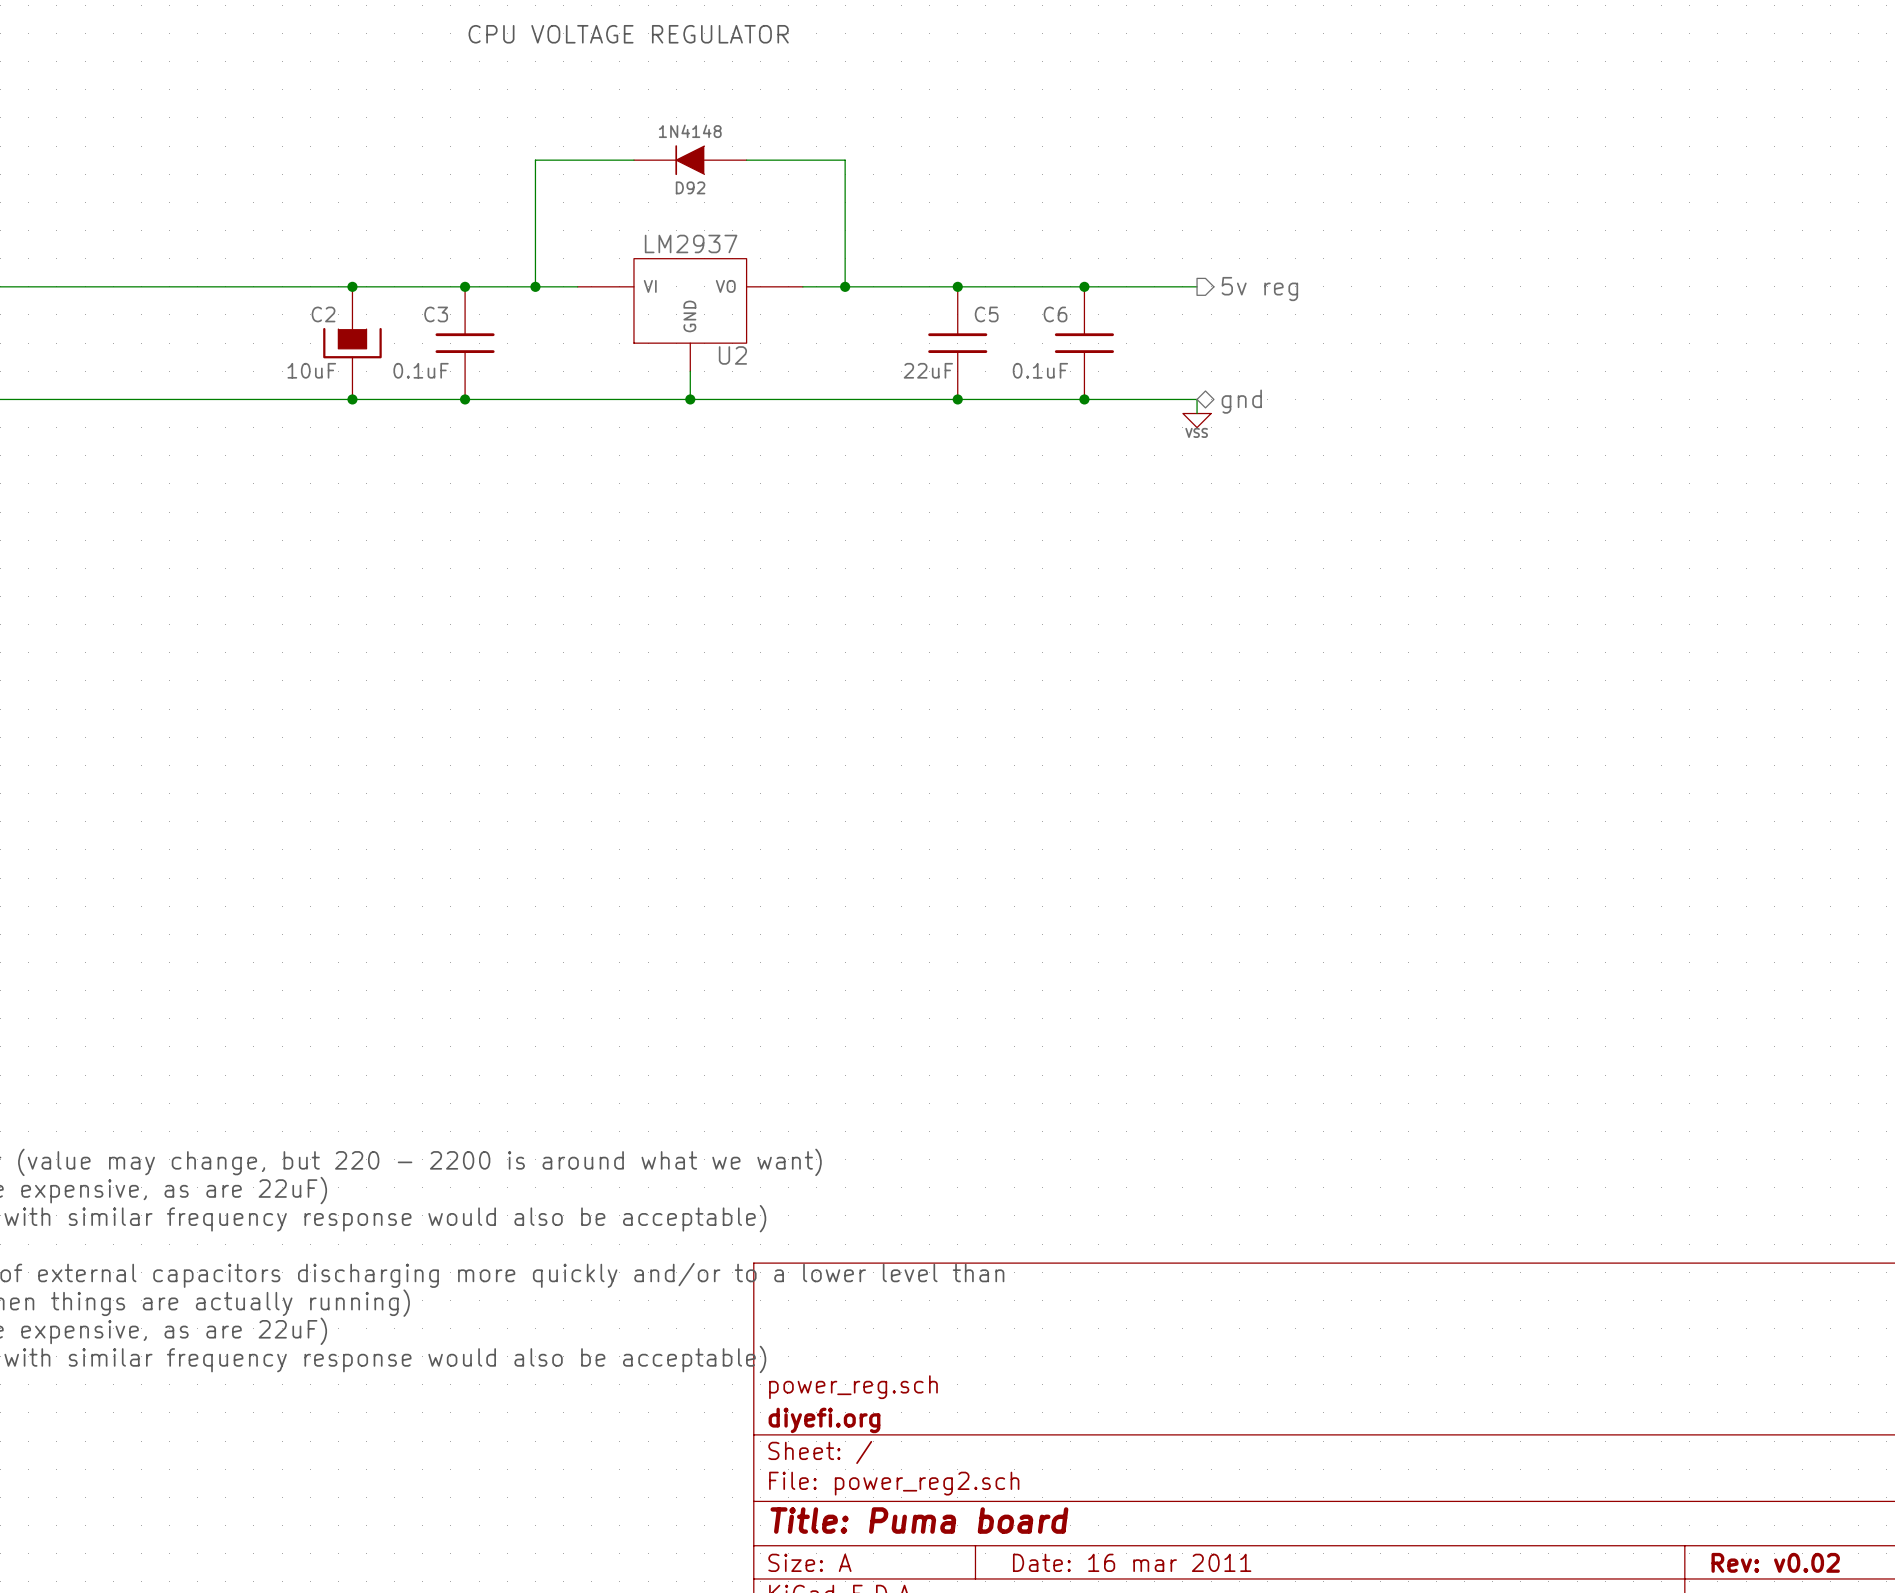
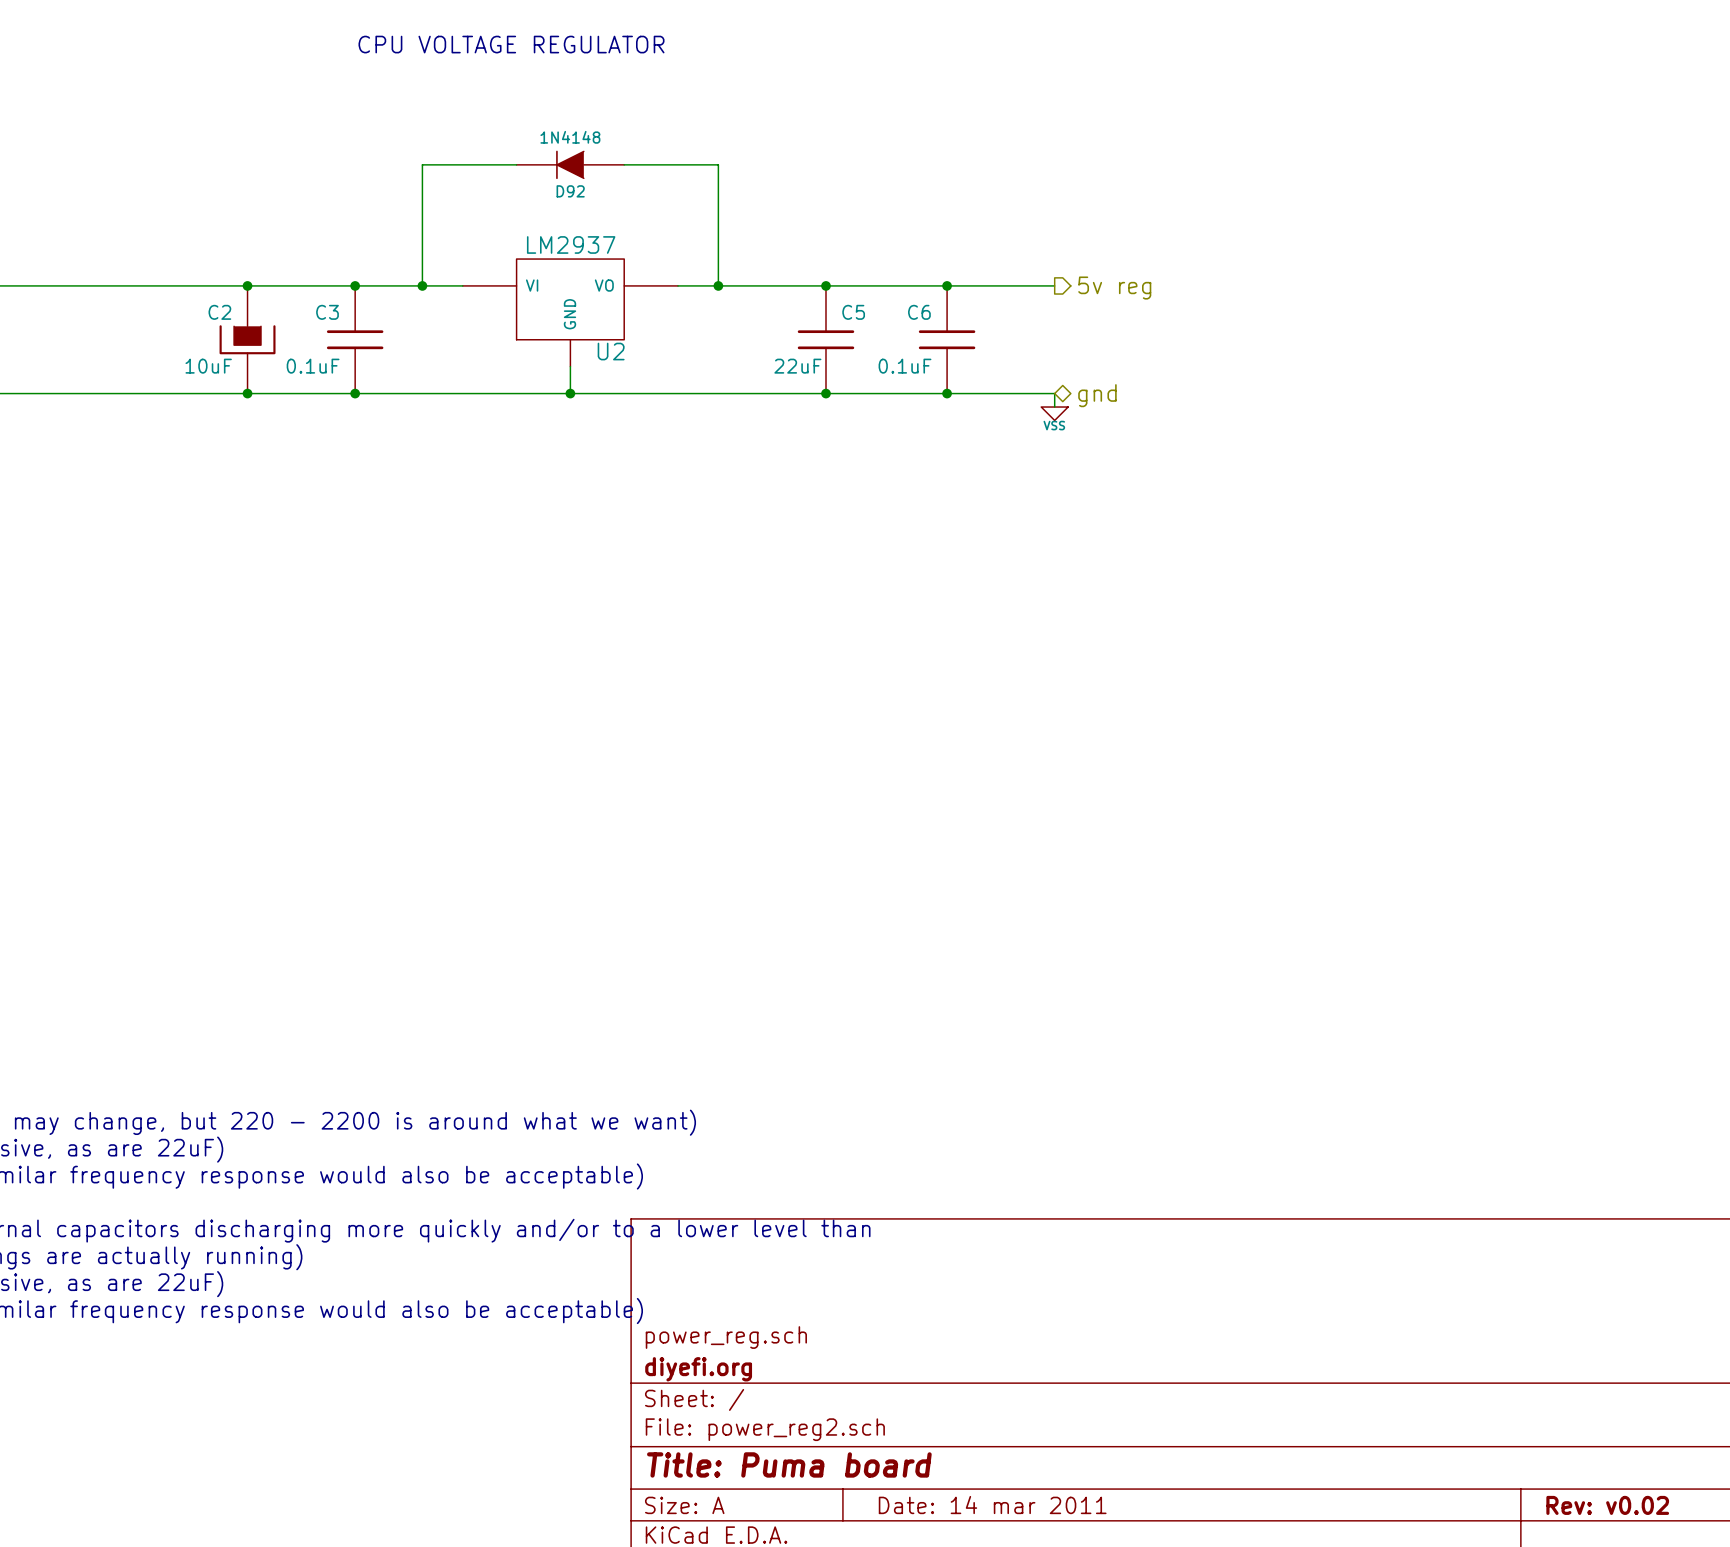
title block: Date: 16 mar 2011 (1132, 1562) -> Date: 14 mar 2011 (992, 1505)

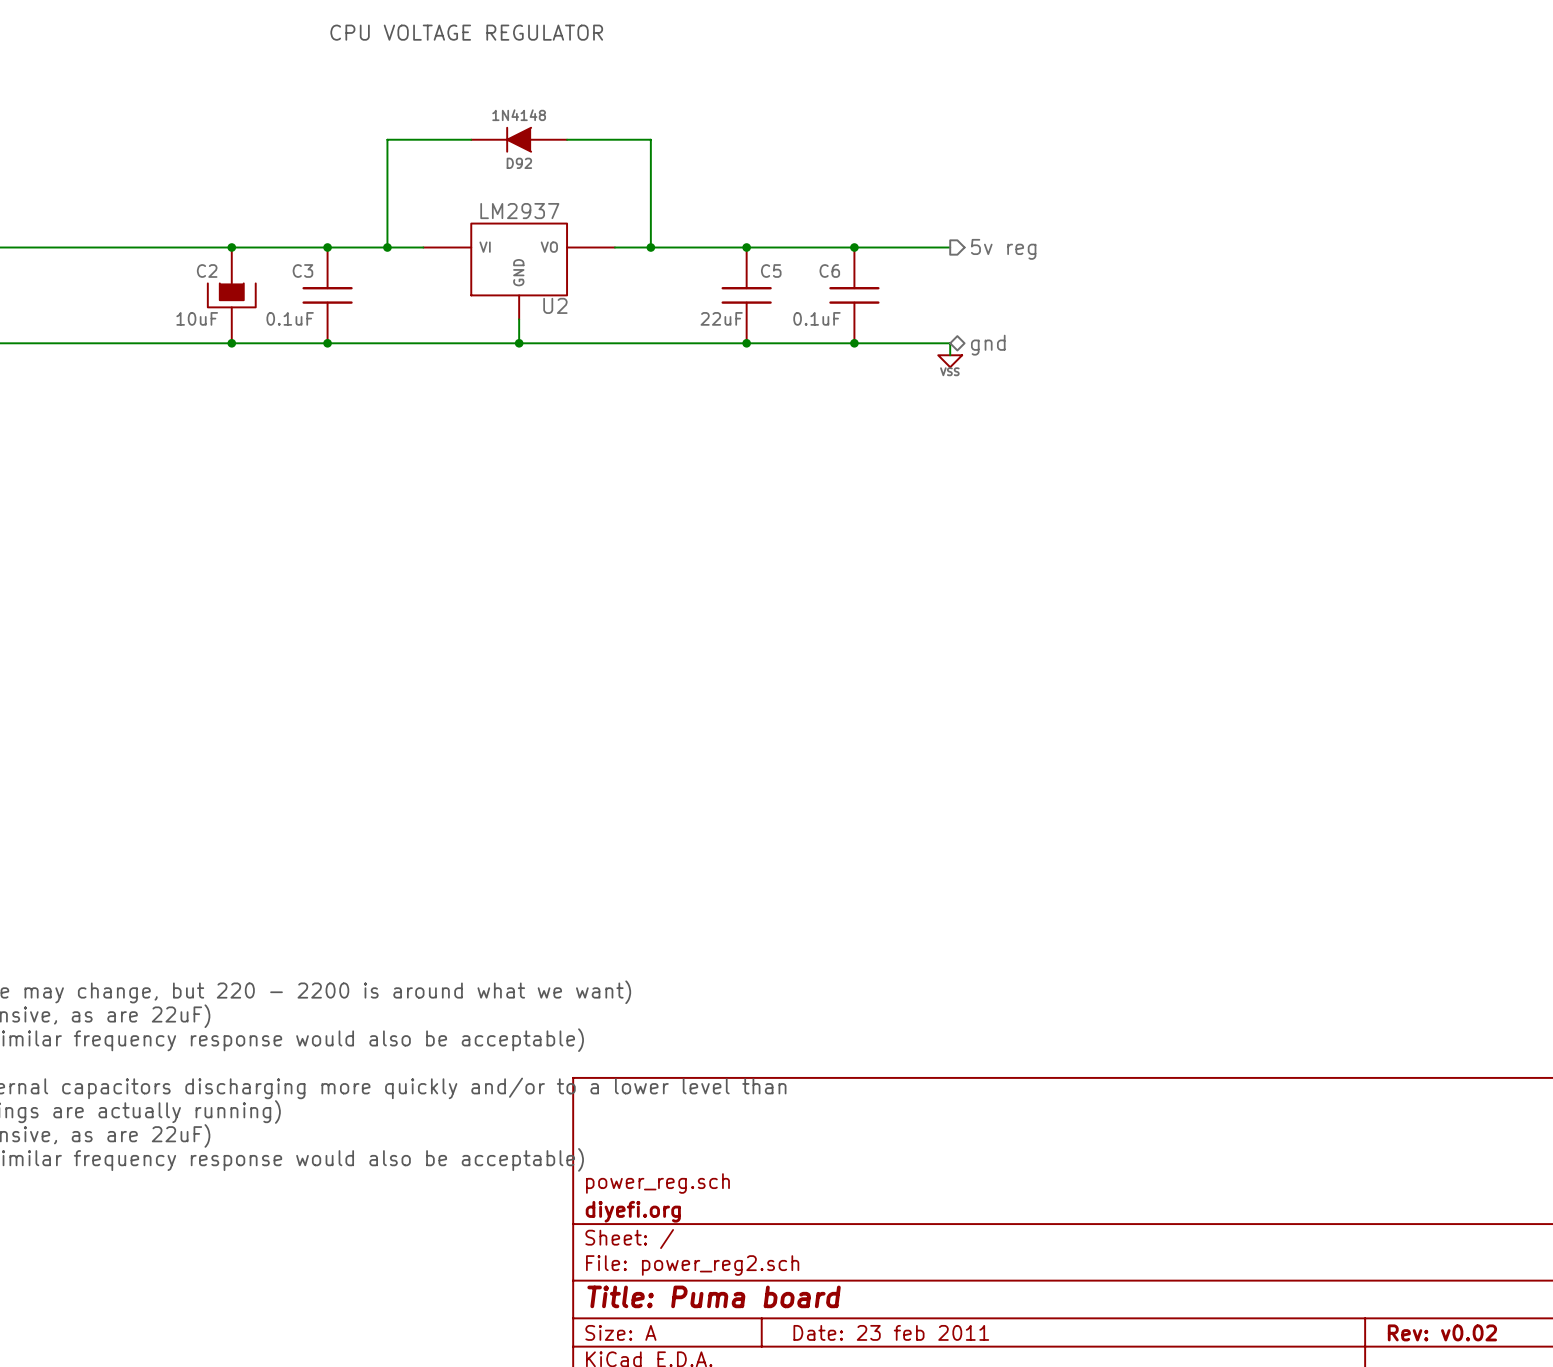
title block: Date: 14 mar 2011 (992, 1505) -> Date: 23 feb 2011 (891, 1332)

